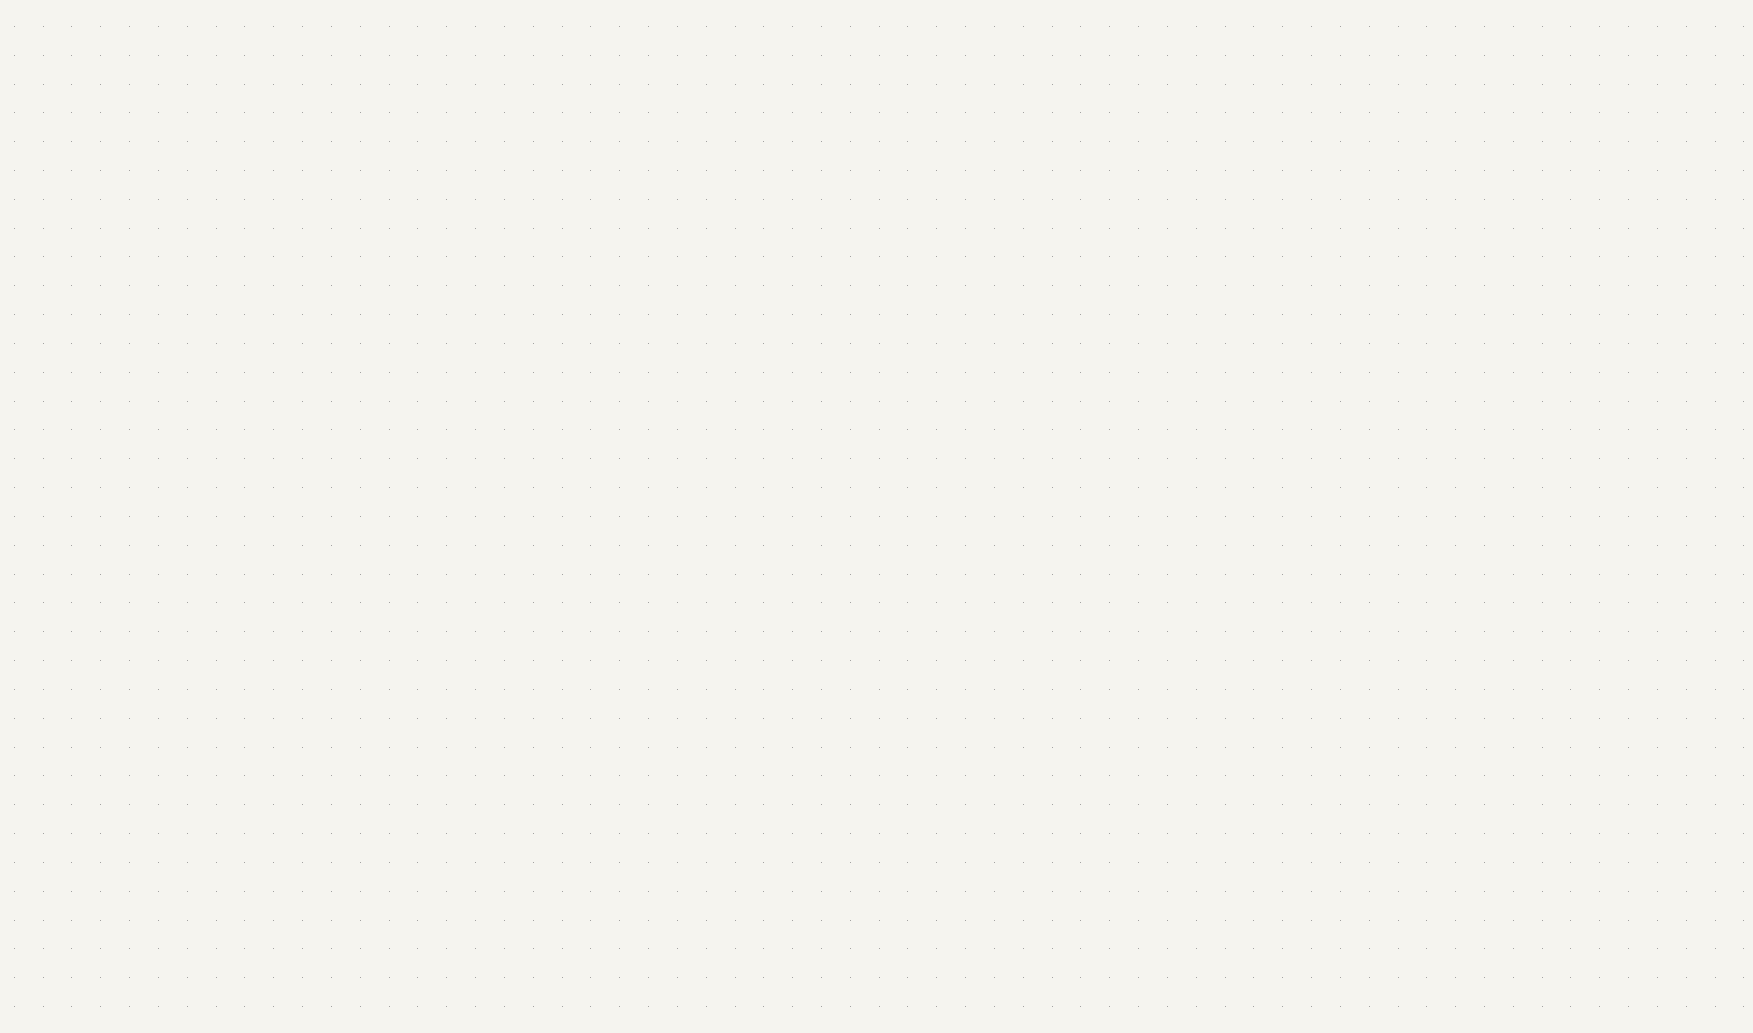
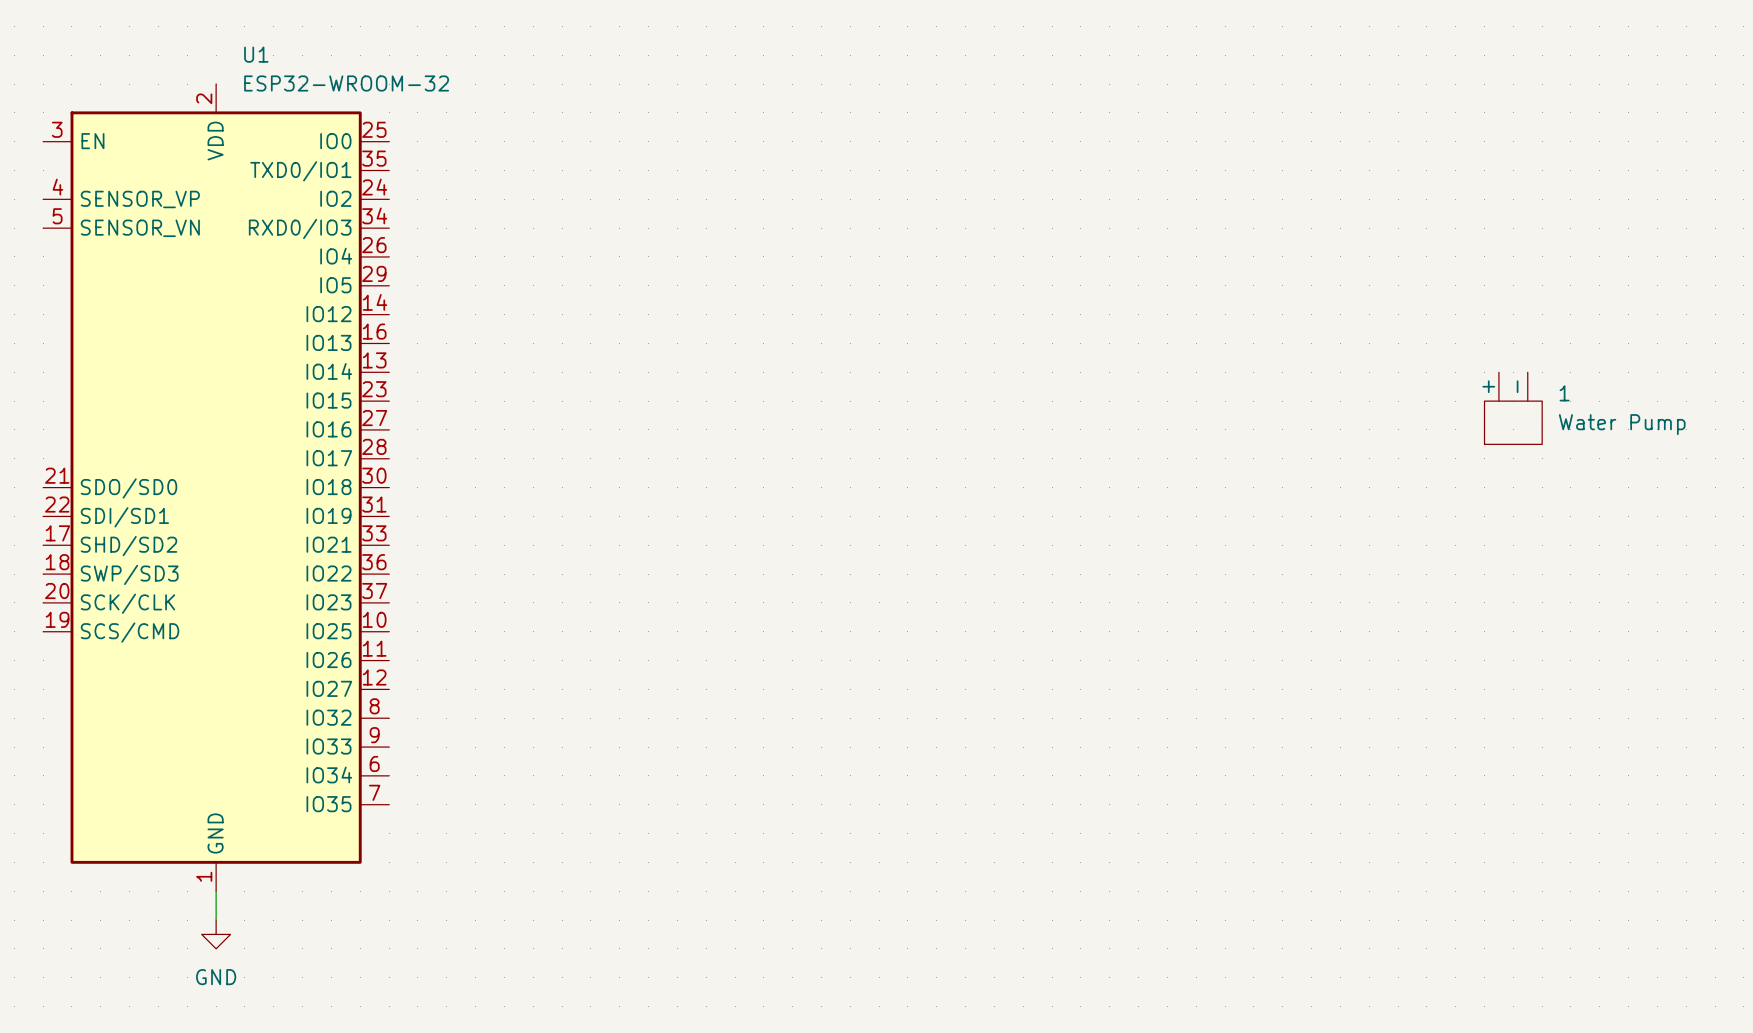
1: none -> Water Pump (1513, 408)
U1: none -> ESP32-WROOM-32 (216, 487)
wire: none -> (216, 891) (216, 920)
power symbol: none -> GND (216, 934)

